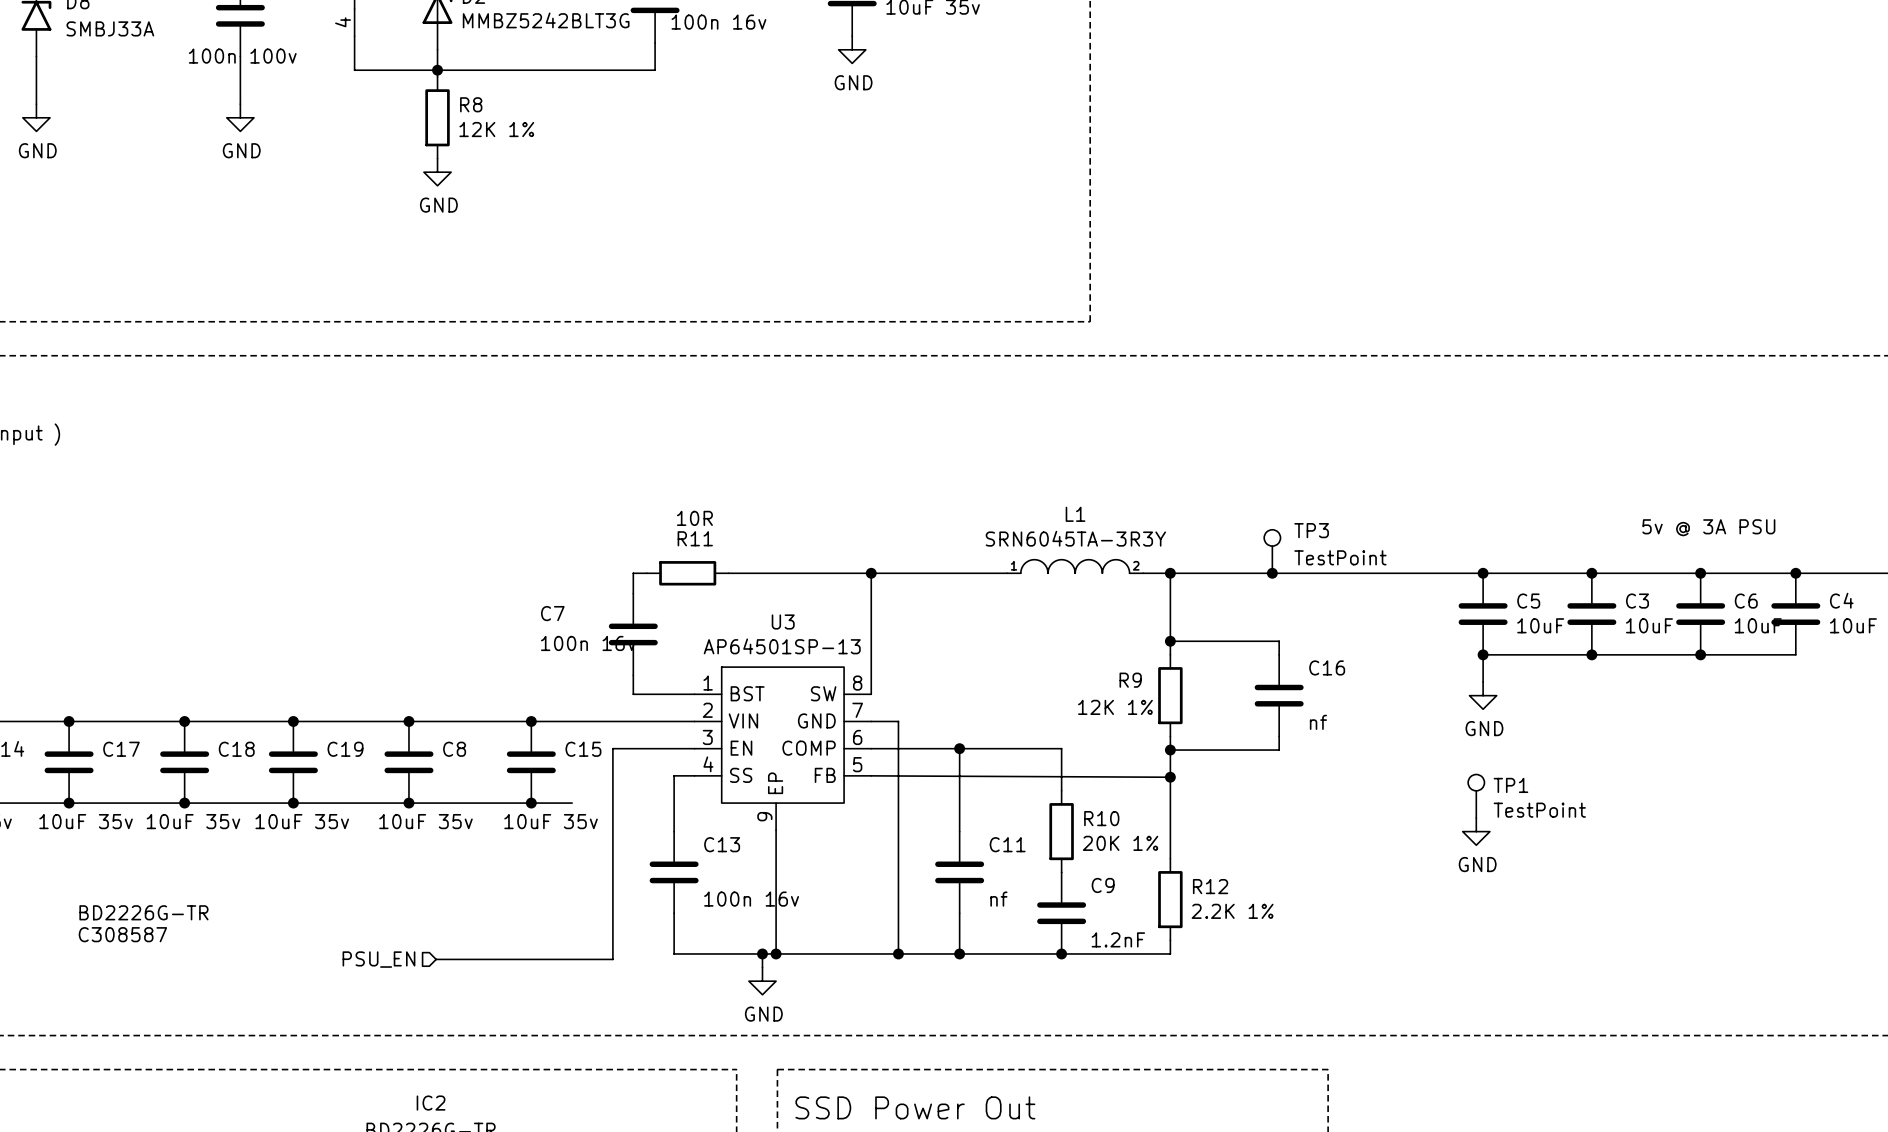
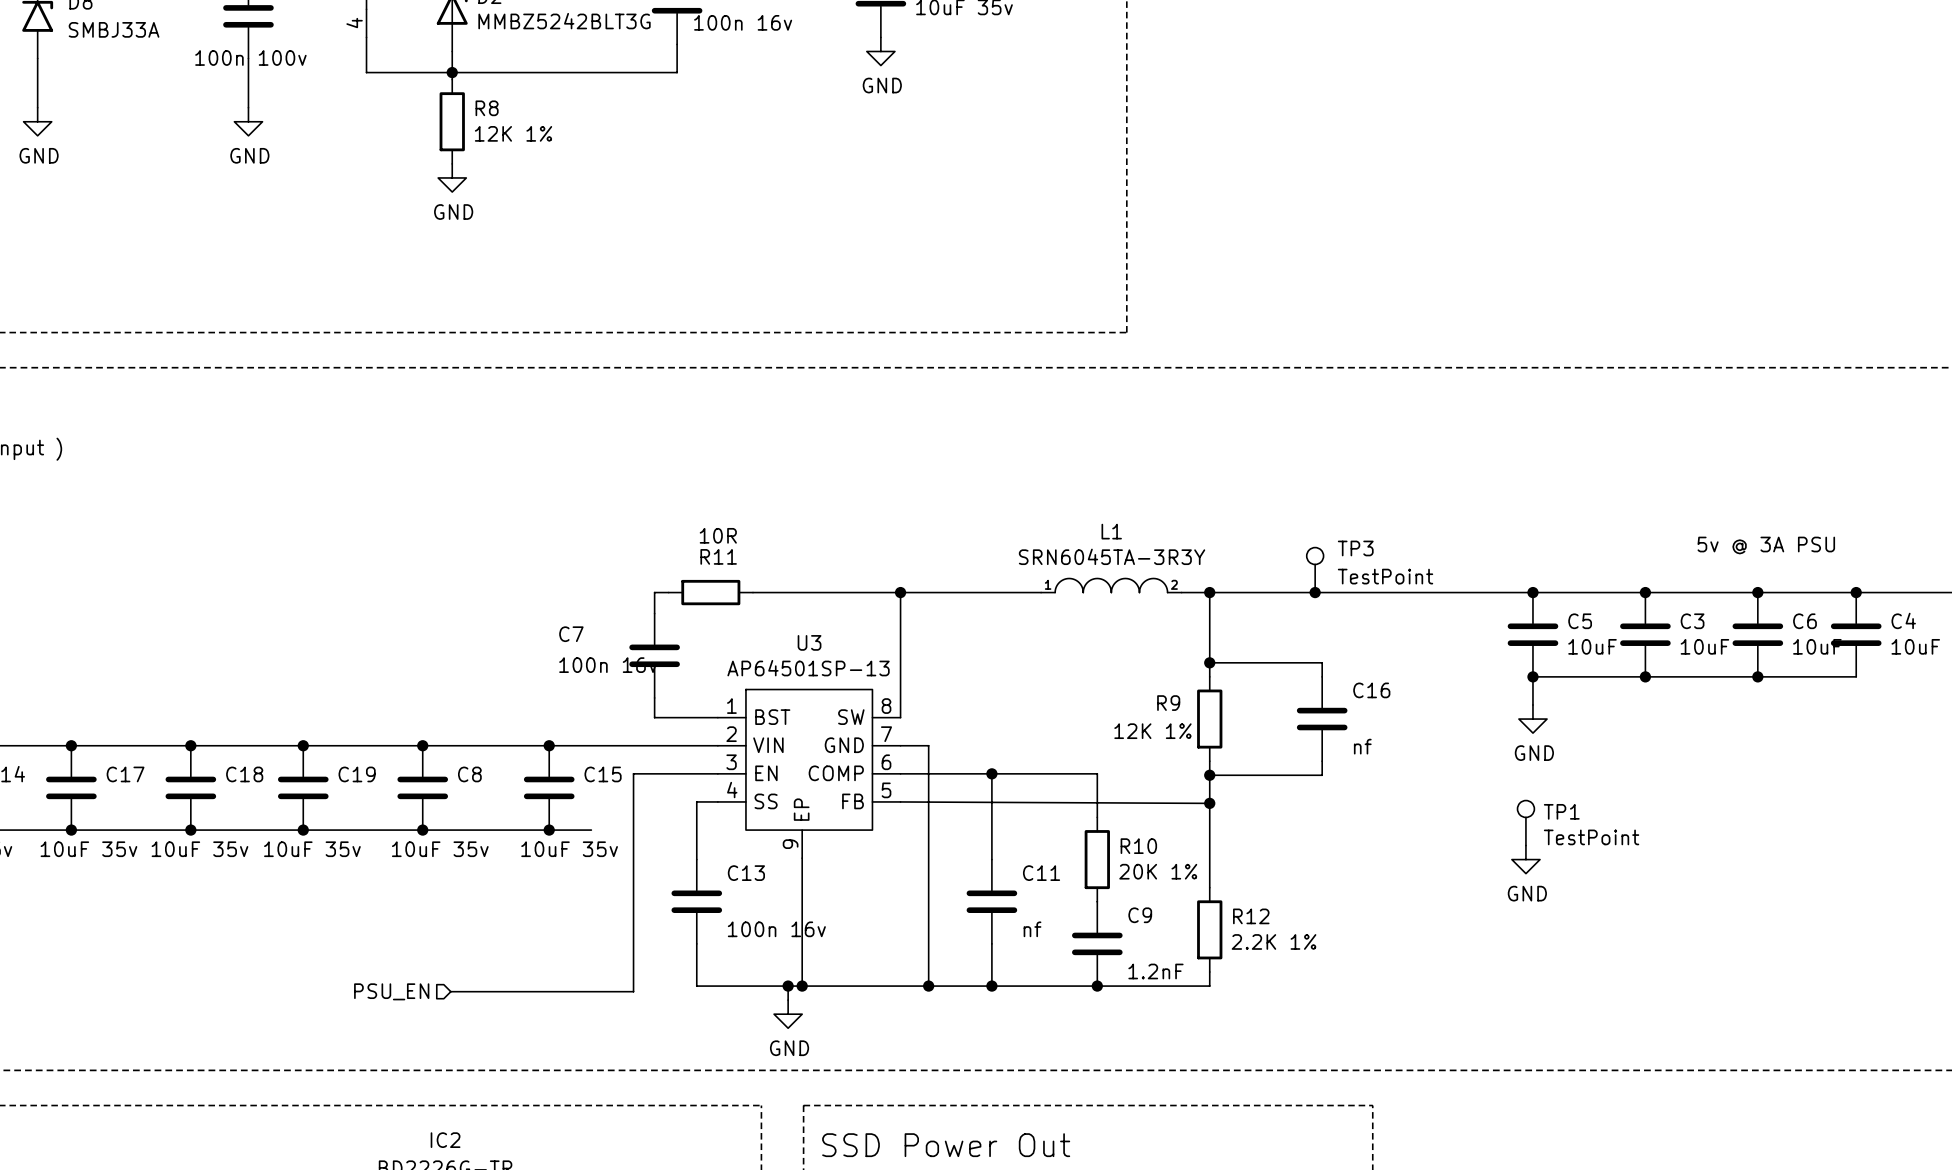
text: BD2226G-TR (143, 912) -> none
text: C308587 (122, 934) -> none

